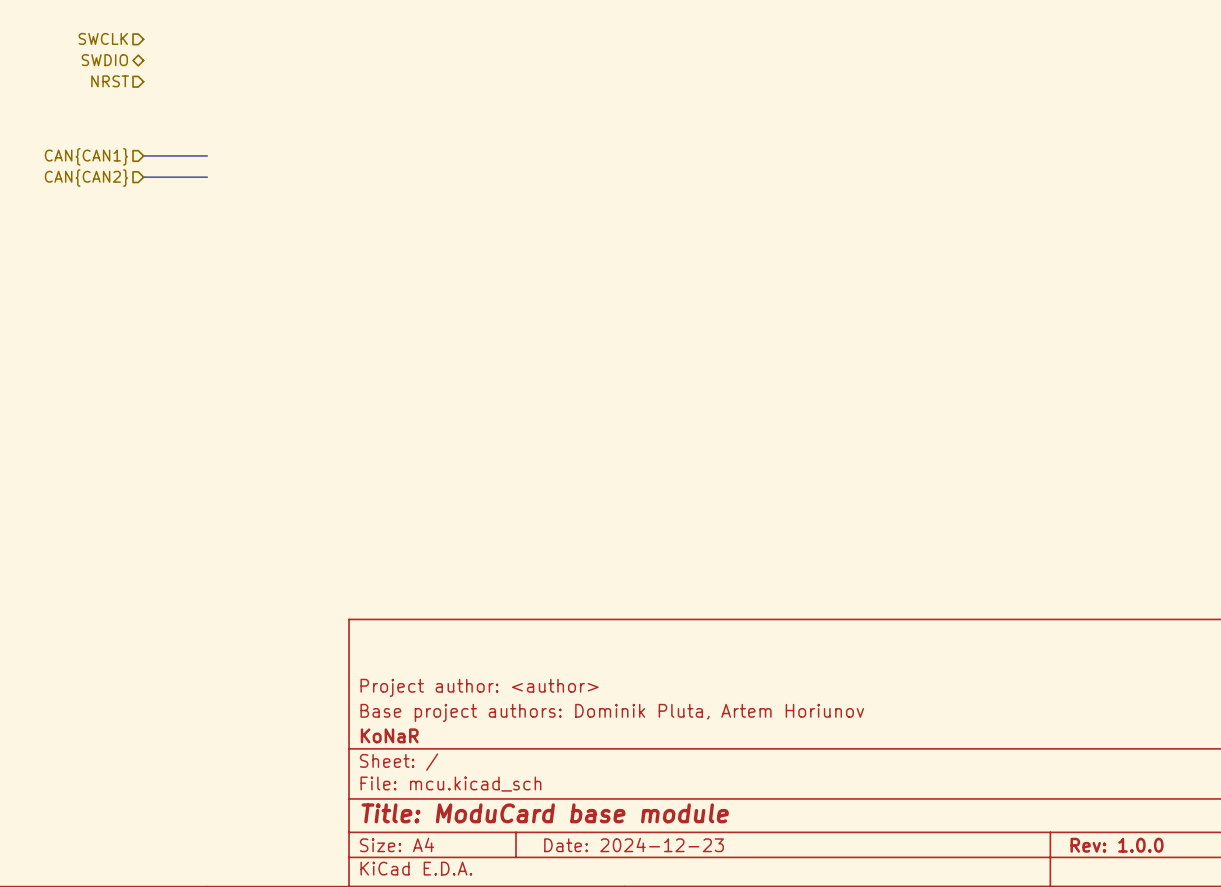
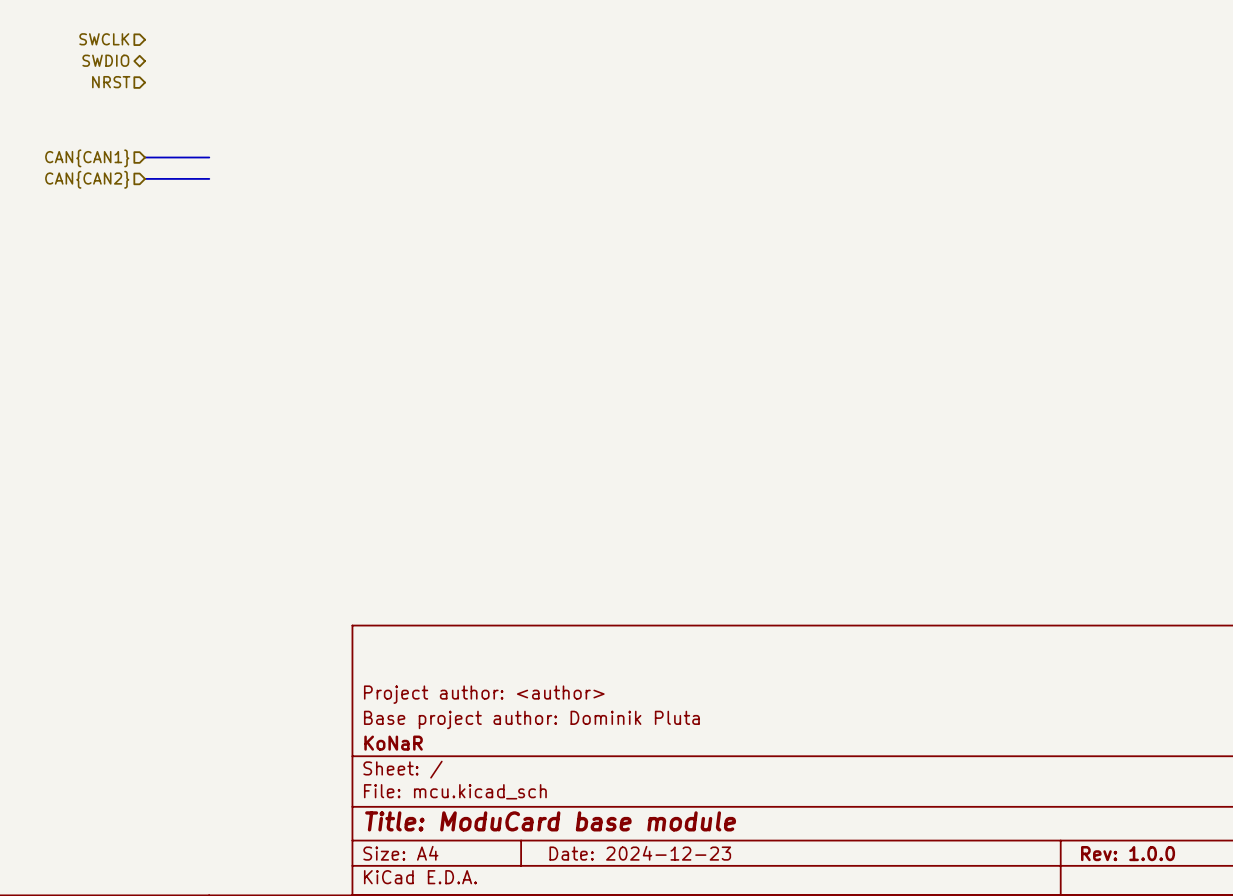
title block: Base project authors: Dominik Pluta, Artem Horiunov (612, 712) -> Base project author: Dominik Pluta (531, 719)

